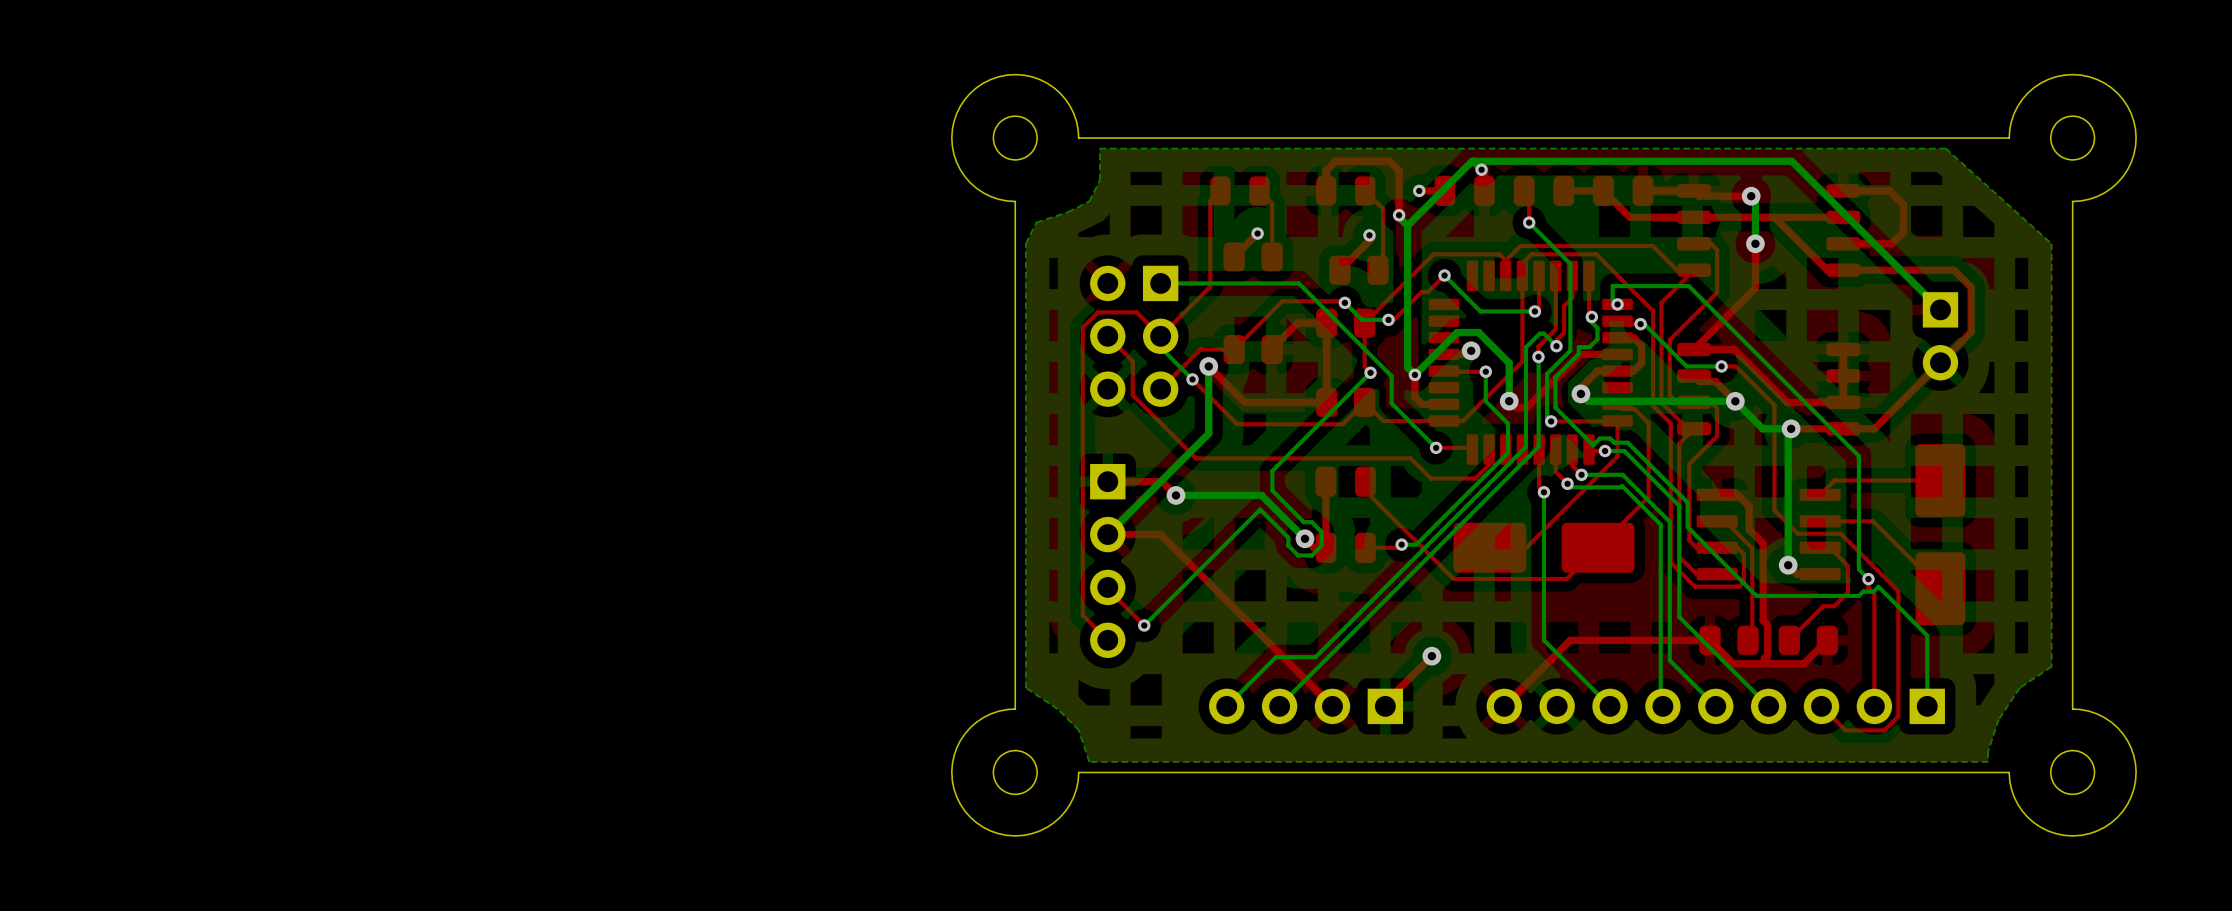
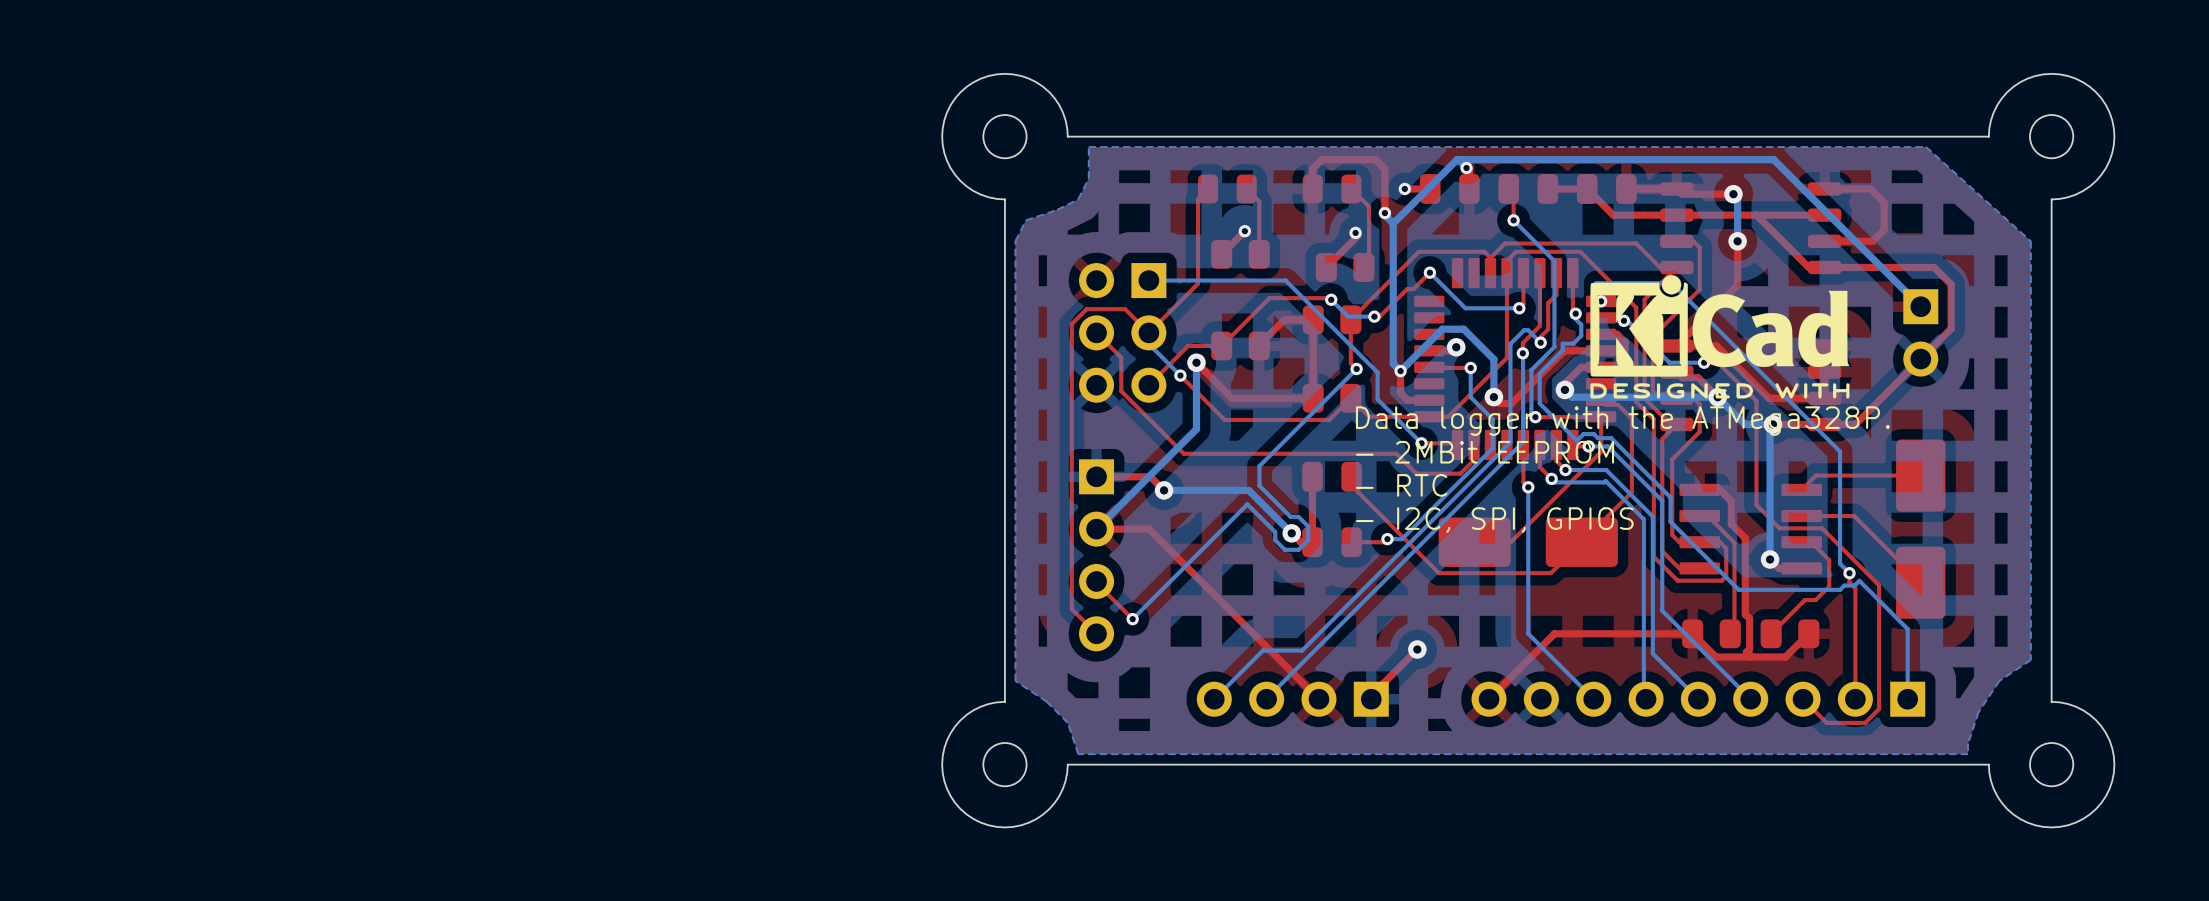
drawing: none -> [1590, 275, 1850, 399]
text: none -> Data logger with the ATMega328P. (1622, 421)
text: none -> - 2MBit EEPROM (1484, 452)
text: none -> - RTC (1401, 485)
text: none -> - I2C, SPI, GPIOS (1494, 520)

